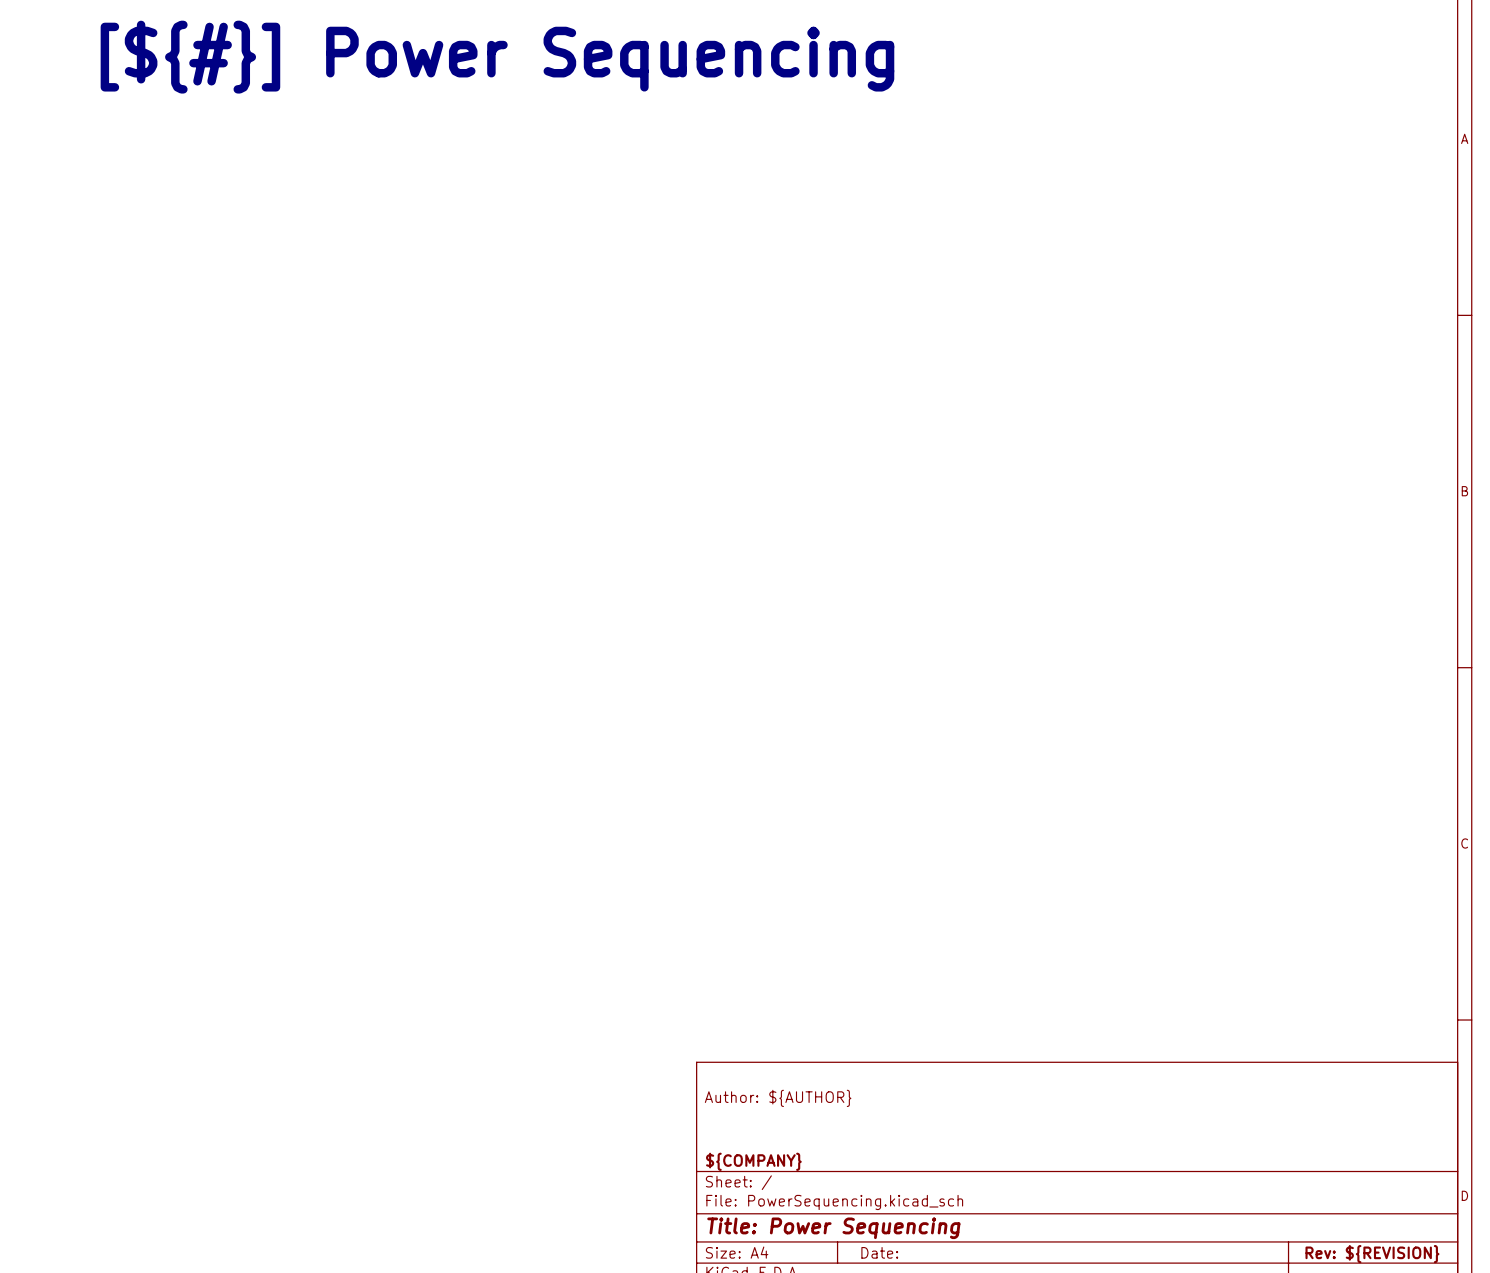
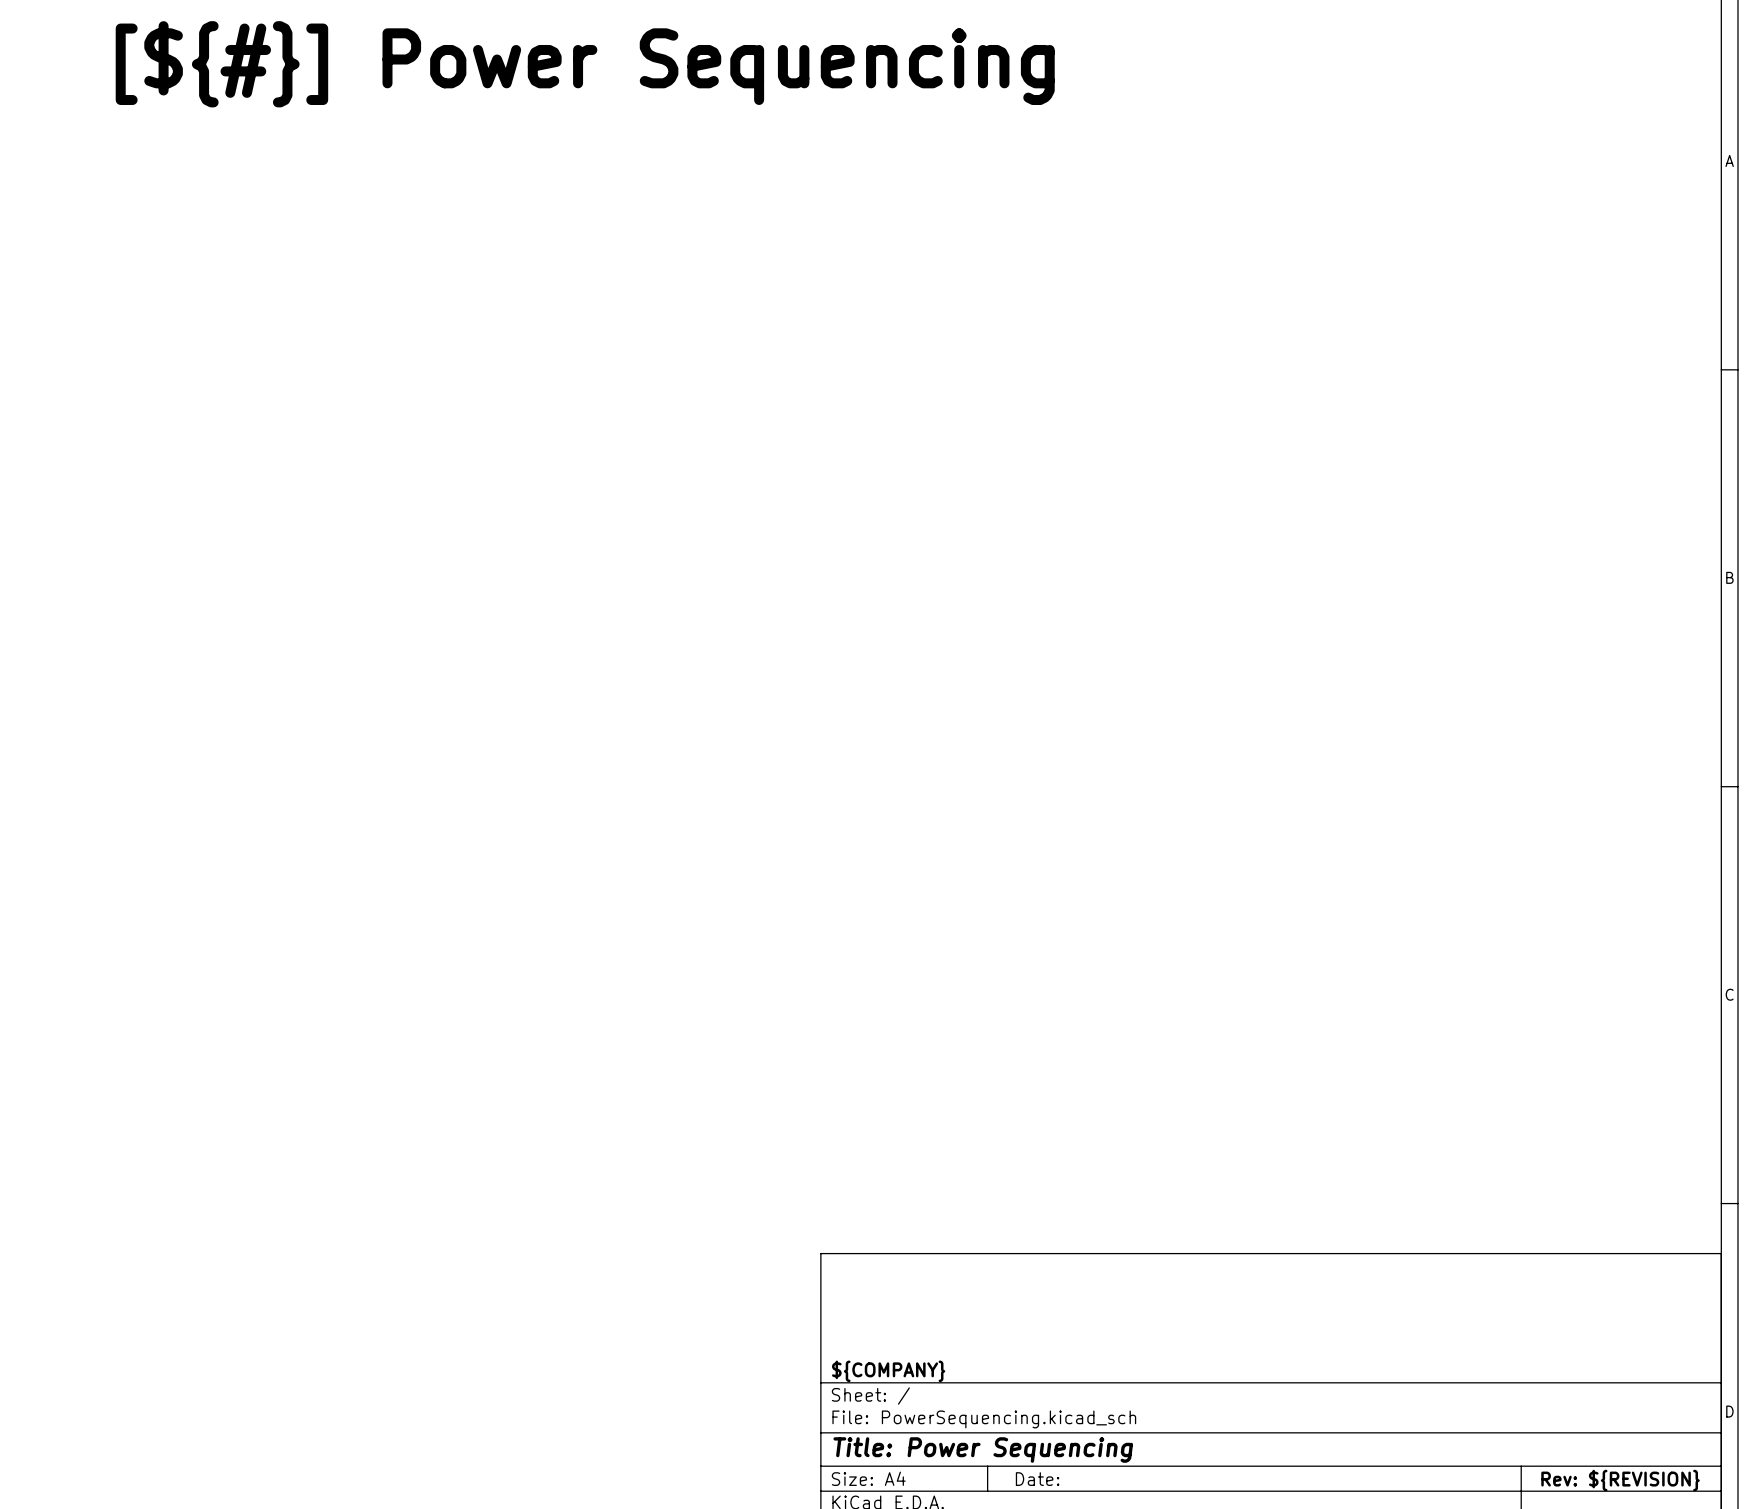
title block: Author: ${AUTHOR} (778, 1098) -> none

